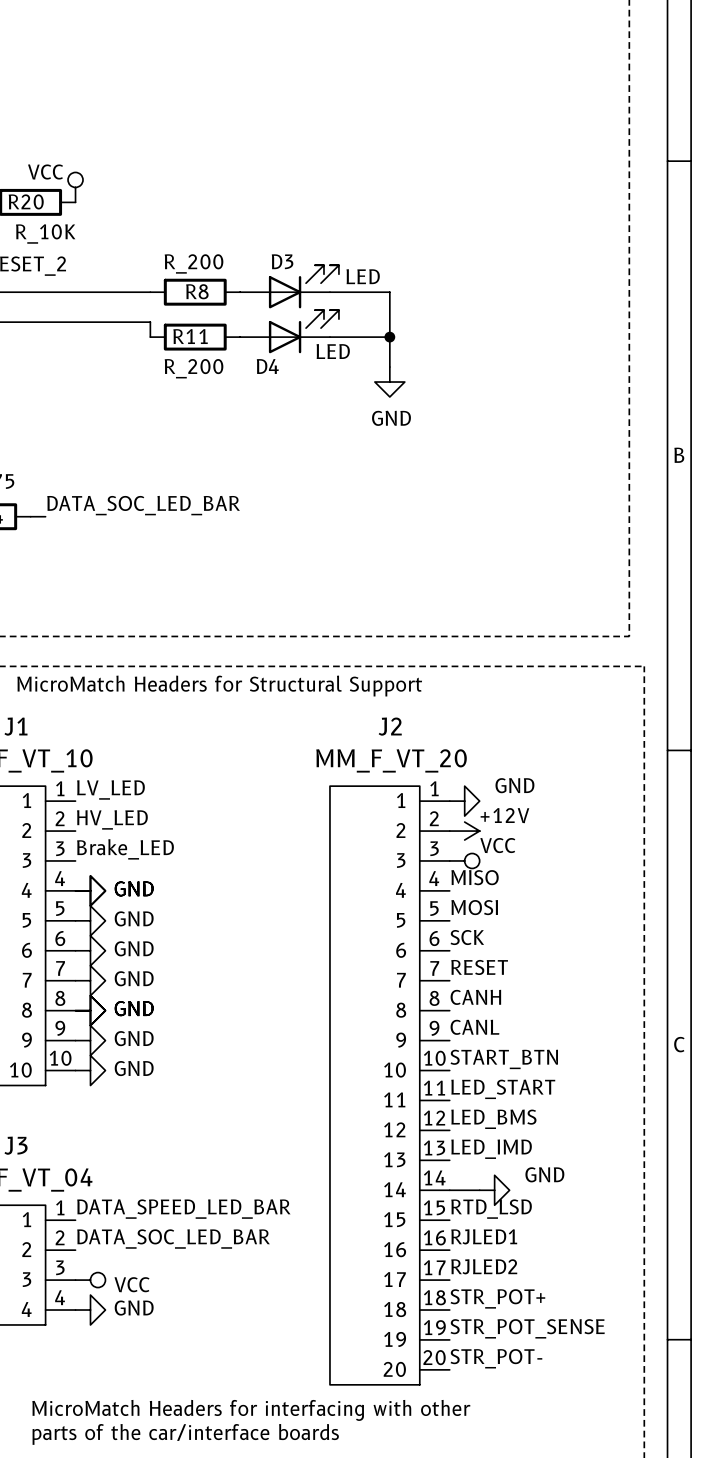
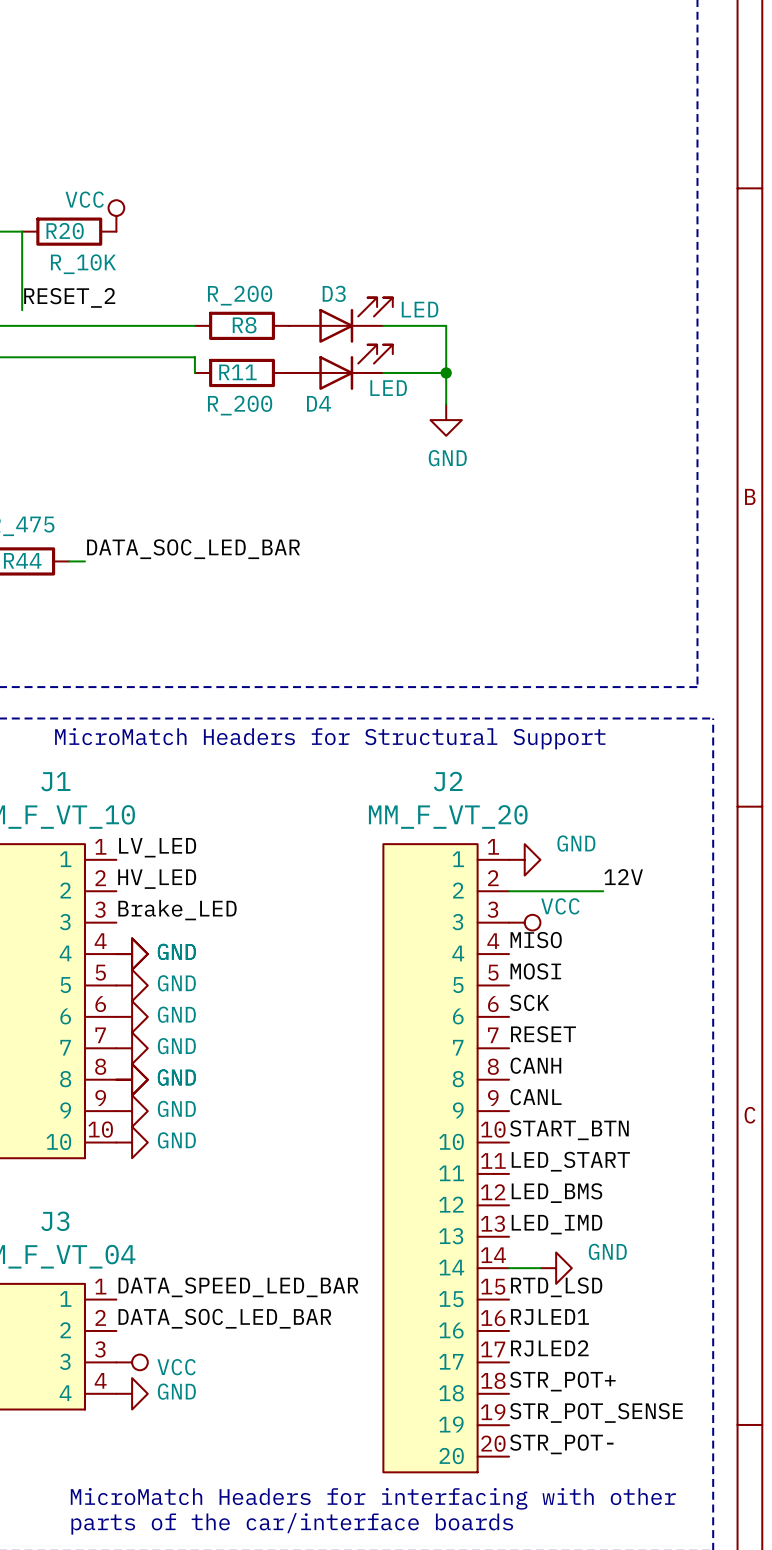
label: none -> 12V (623, 877)
wire: none -> (509, 891) (603, 891)
power symbol: +12V (464, 831) -> none

